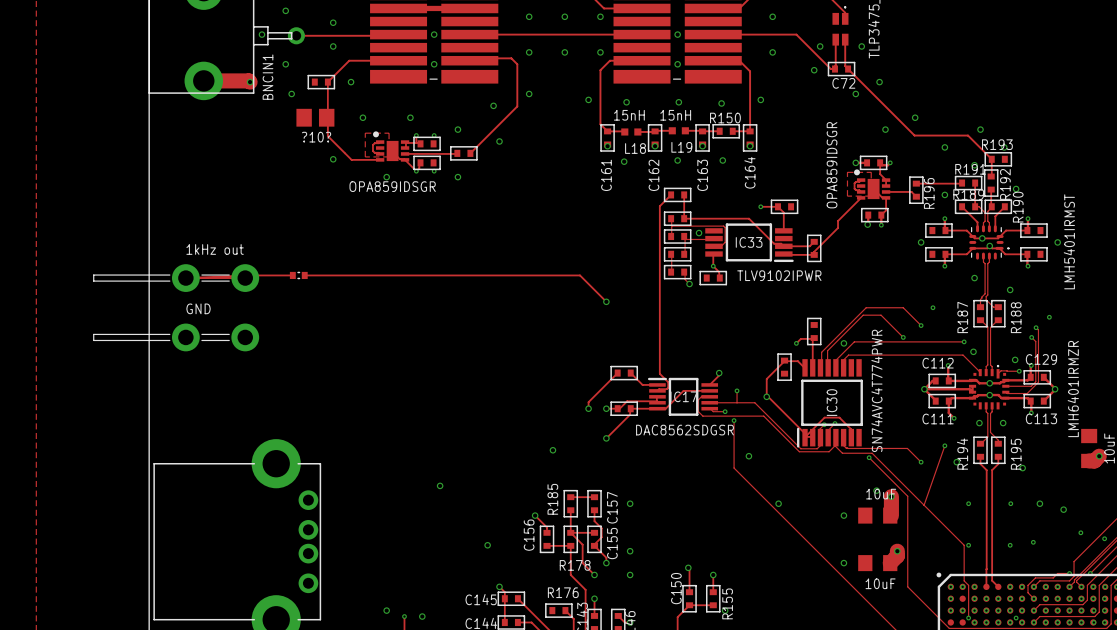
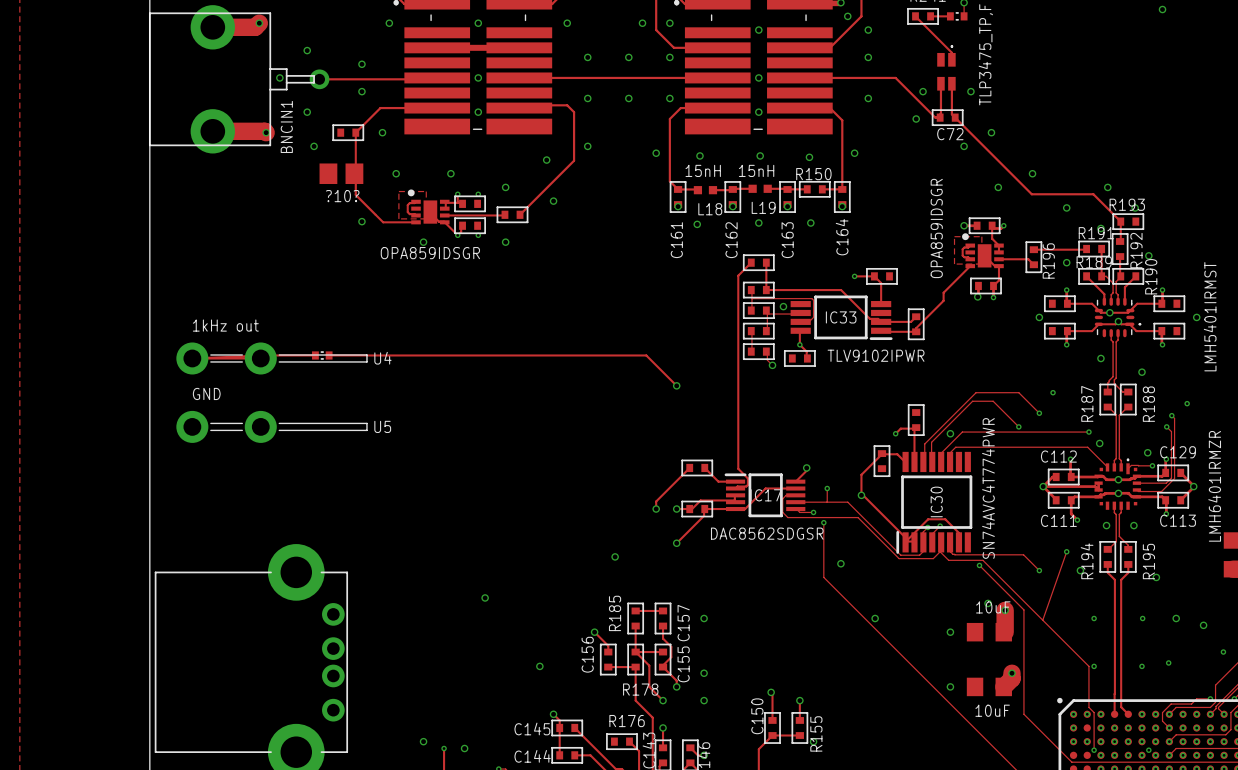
part: (176, 278) -> none
U4: none -> (272, 358)
part: (176, 337) -> none
U5: none -> (272, 426)

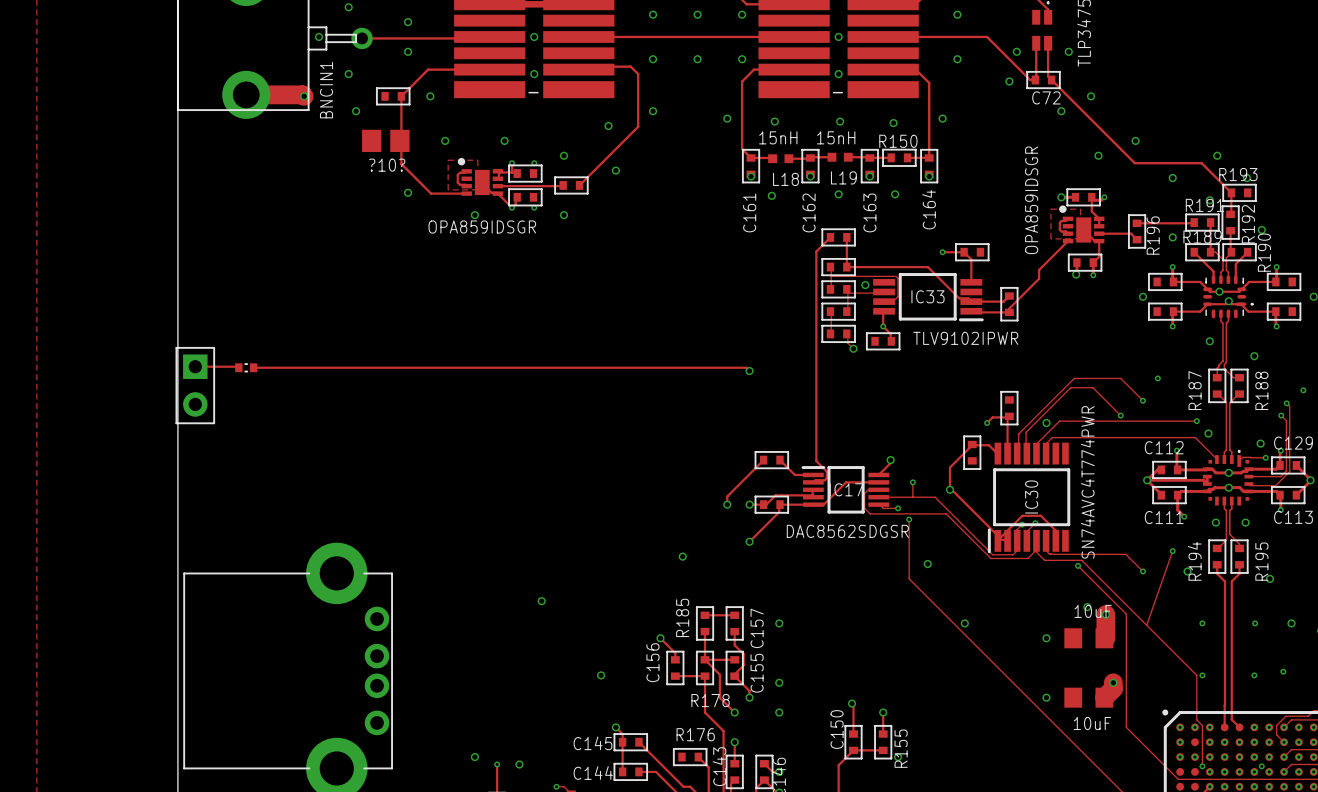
text: 1kHz out (225, 325) -> none
track: (315, 355) (192, 358) -> none
part position: (322, 355) -> (246, 367)
track: (329, 355) (646, 355) (673, 382) -> (253, 367) (746, 367)
track: (192, 358) (260, 358) -> none
U4: (272, 358) -> none
track: none -> (195, 366) (238, 367)
text: GND (206, 393) -> none
part: none -> (195, 385)
U5: (272, 426) -> none

